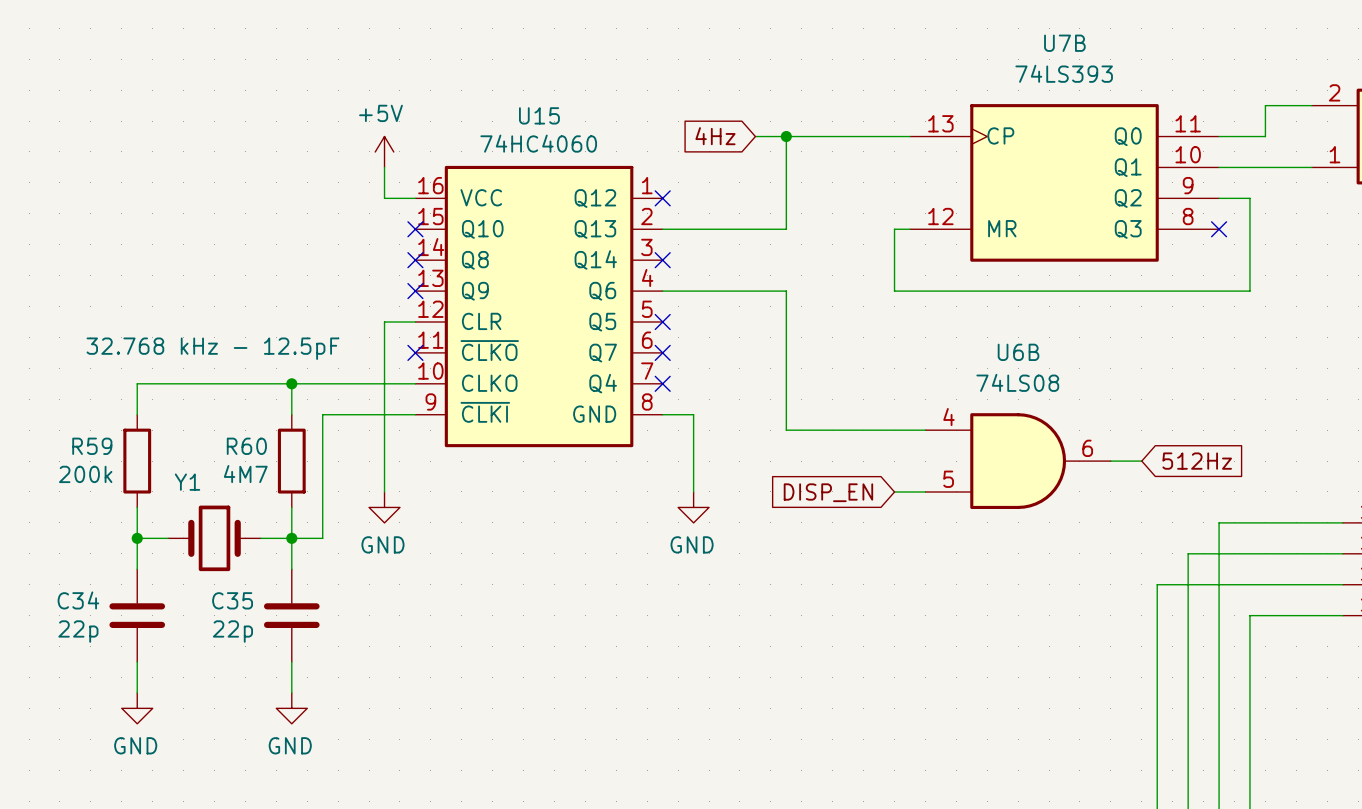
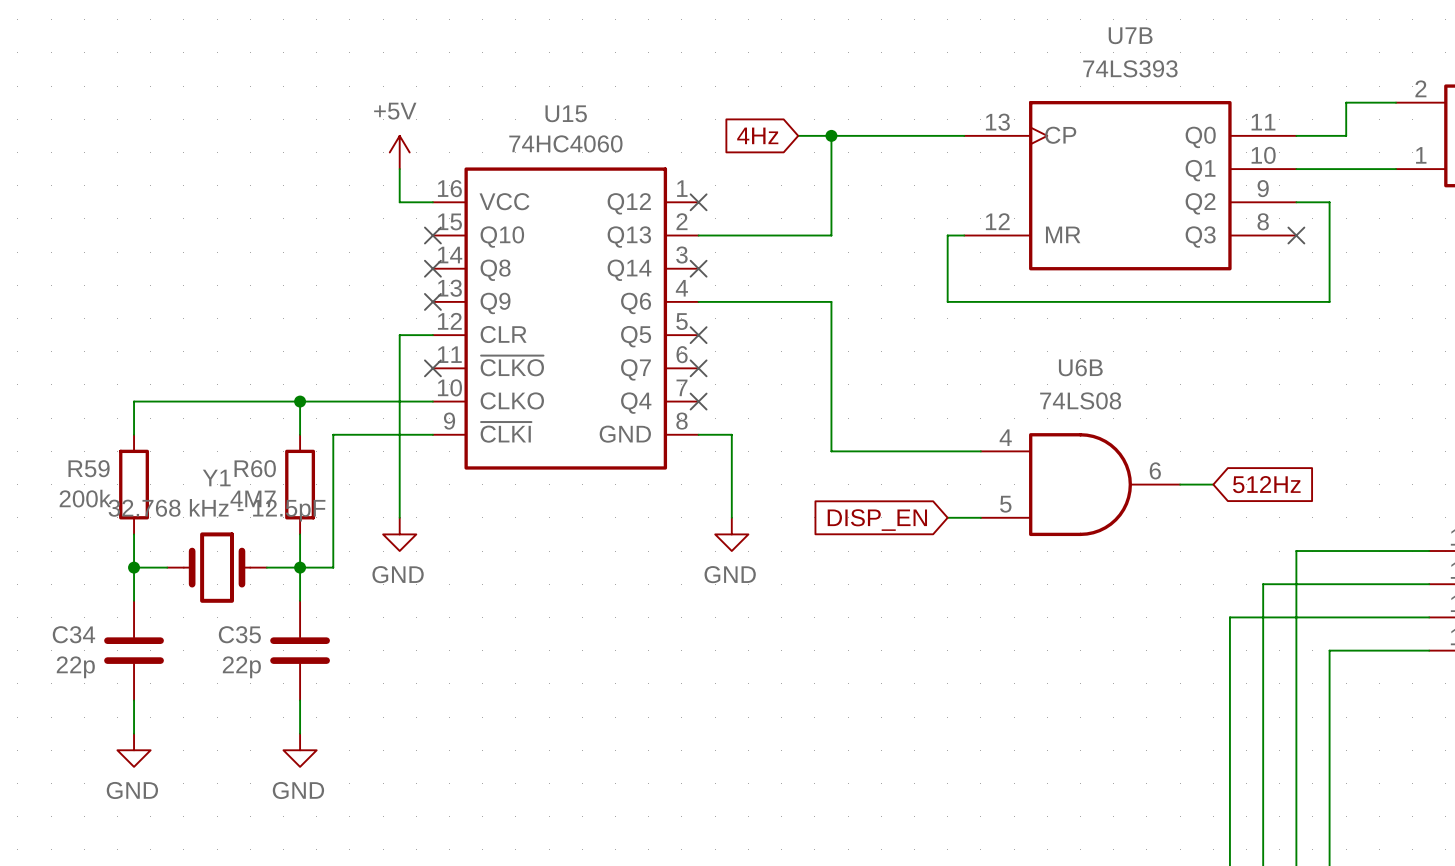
Y1 value position: 32.768 kHz - 12.5pF (212, 348) -> 32.768 kHz - 12.5pF (217, 510)
Y1 name position: Y1 (187, 482) -> Y1 (216, 477)

